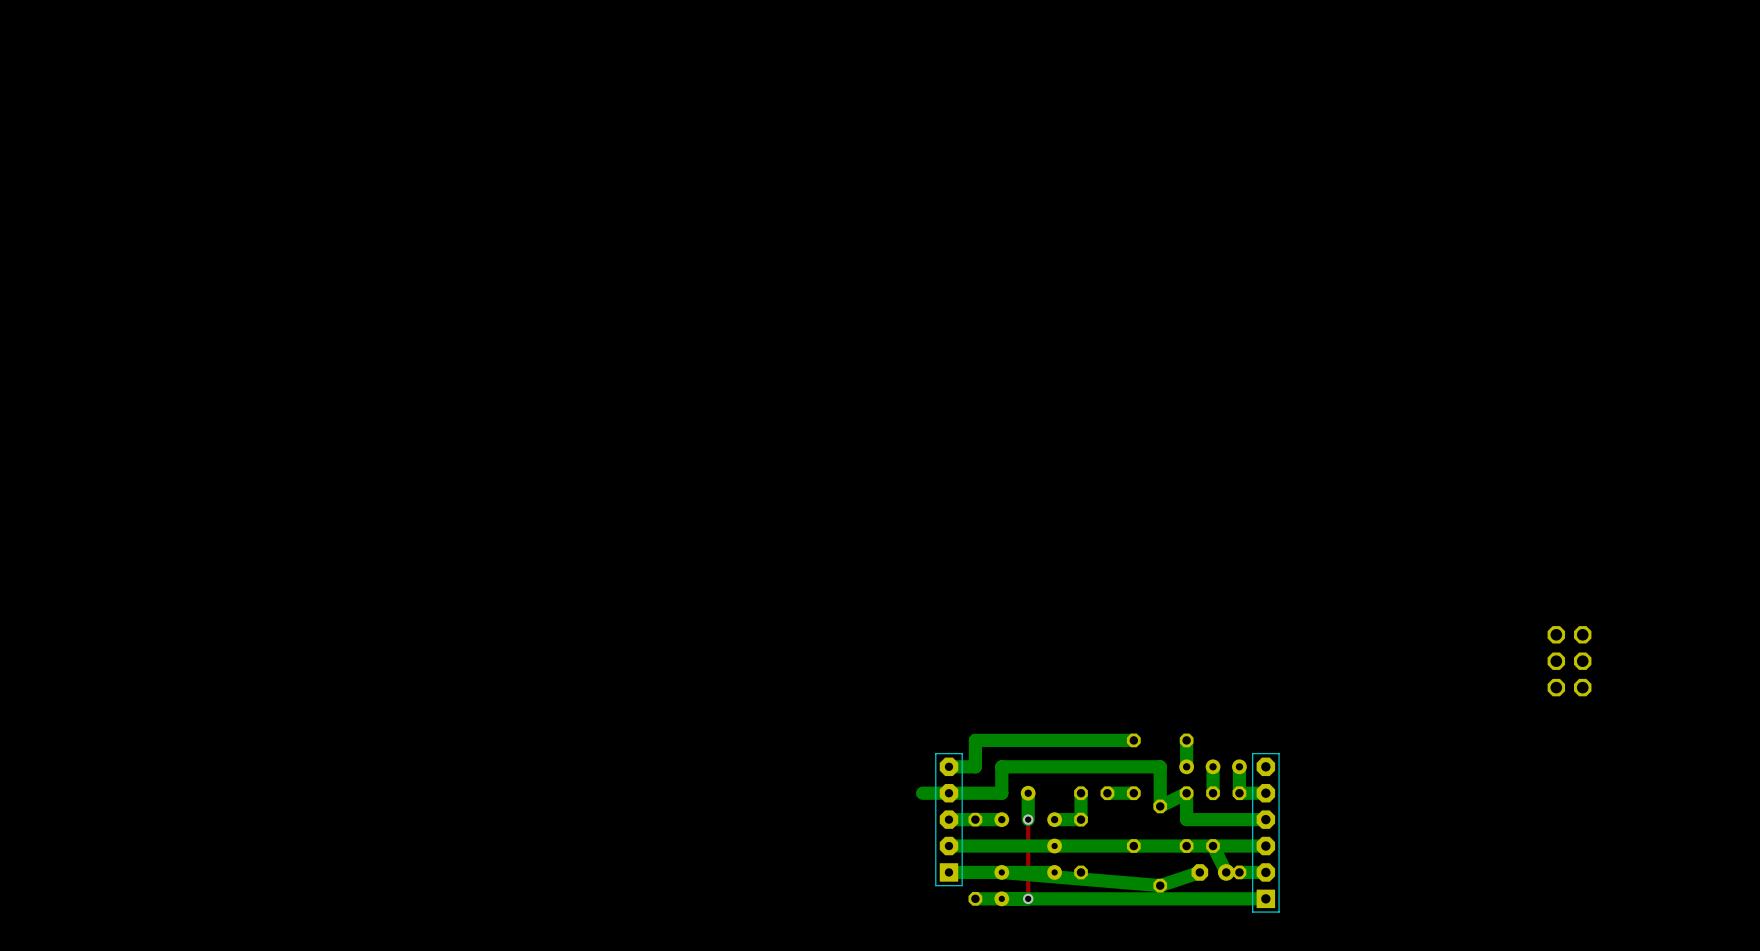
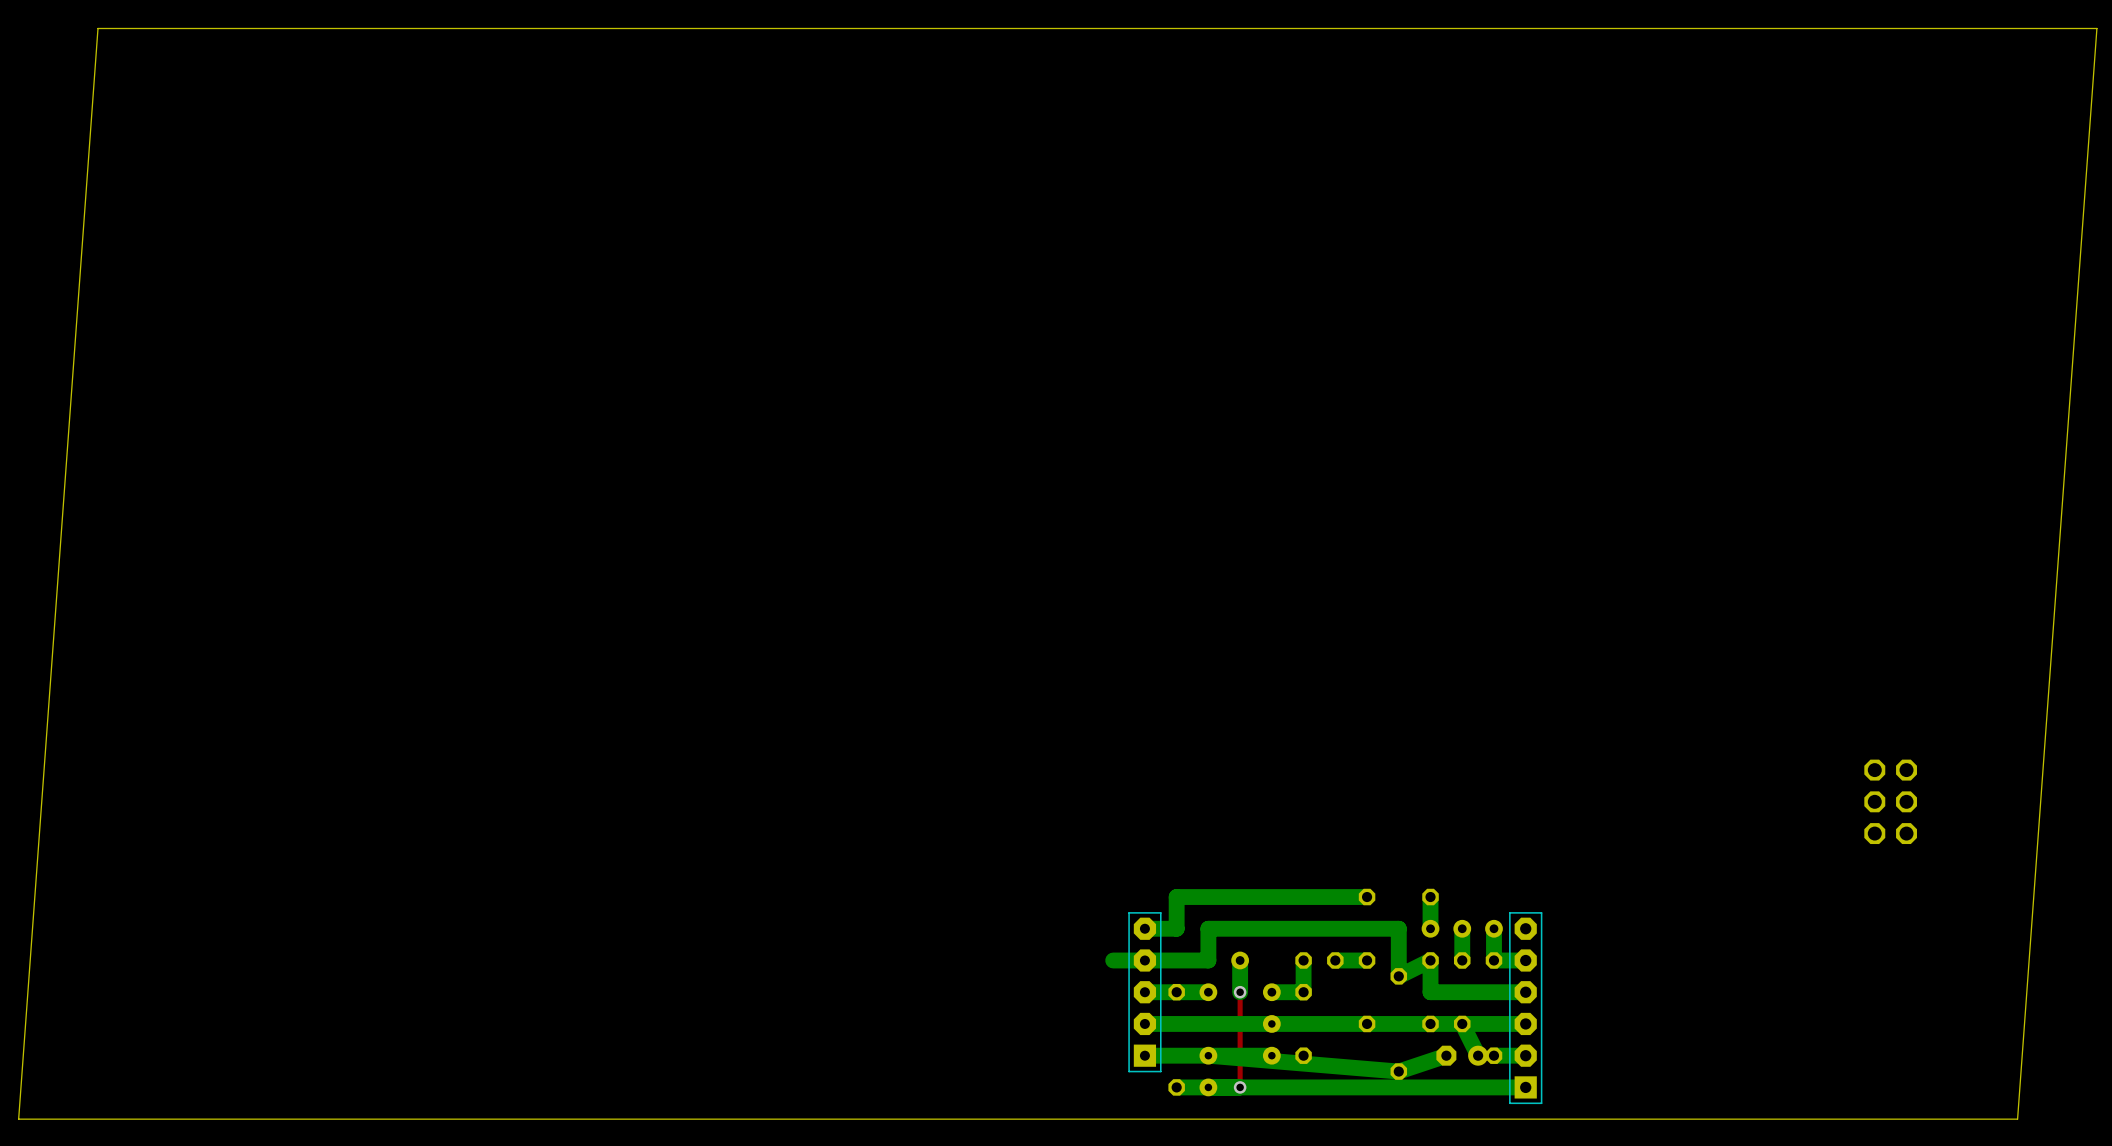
board edge: none -> (2096, 28) (97, 28) (18, 1119) (2017, 1119) (2096, 28)

